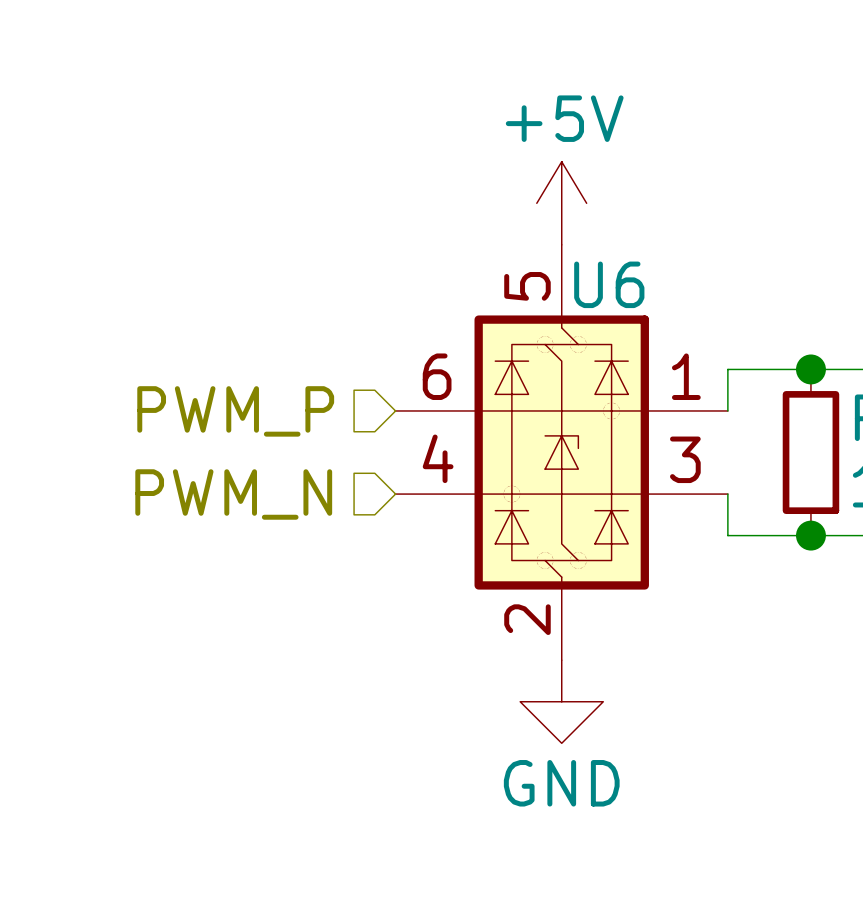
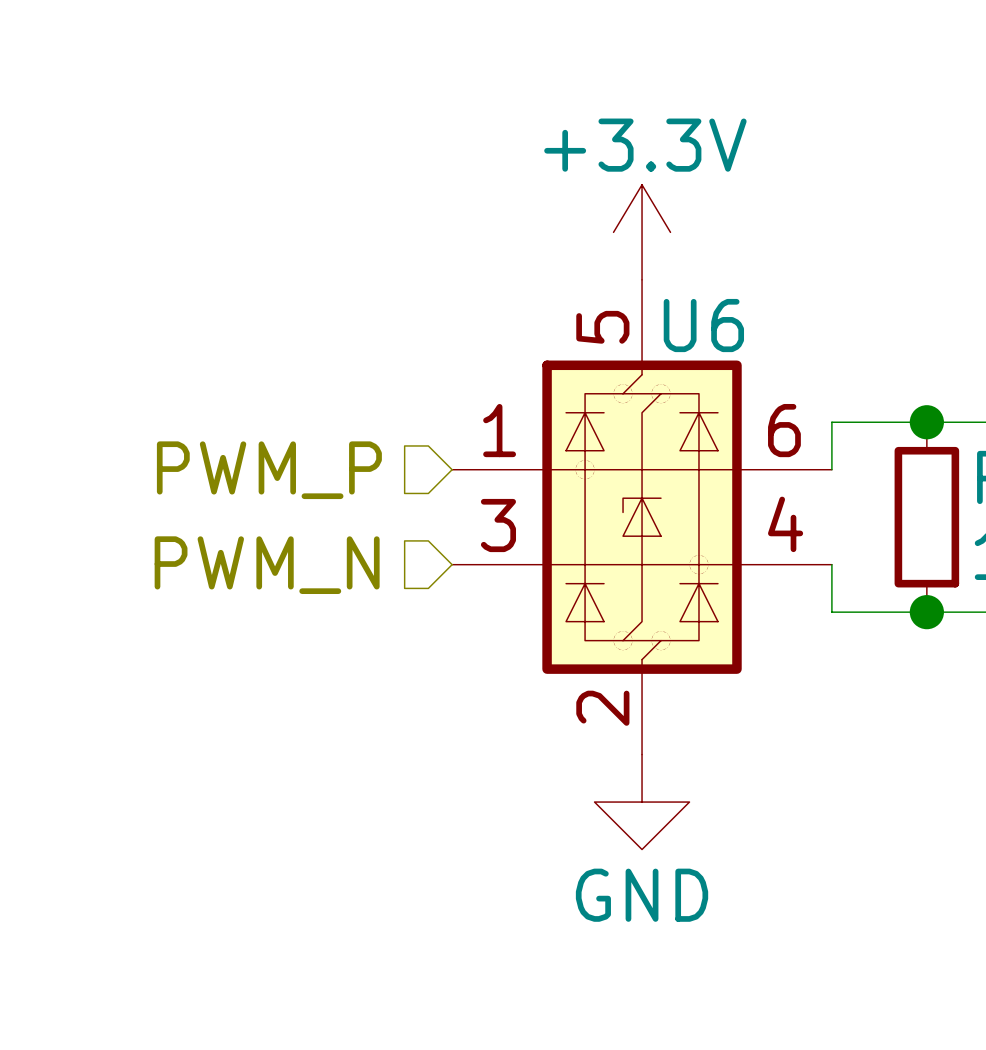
power symbol: +5V (561, 203) -> +3.3V (642, 232)
U6 flip: as is (561, 452) -> left-right (642, 517)

